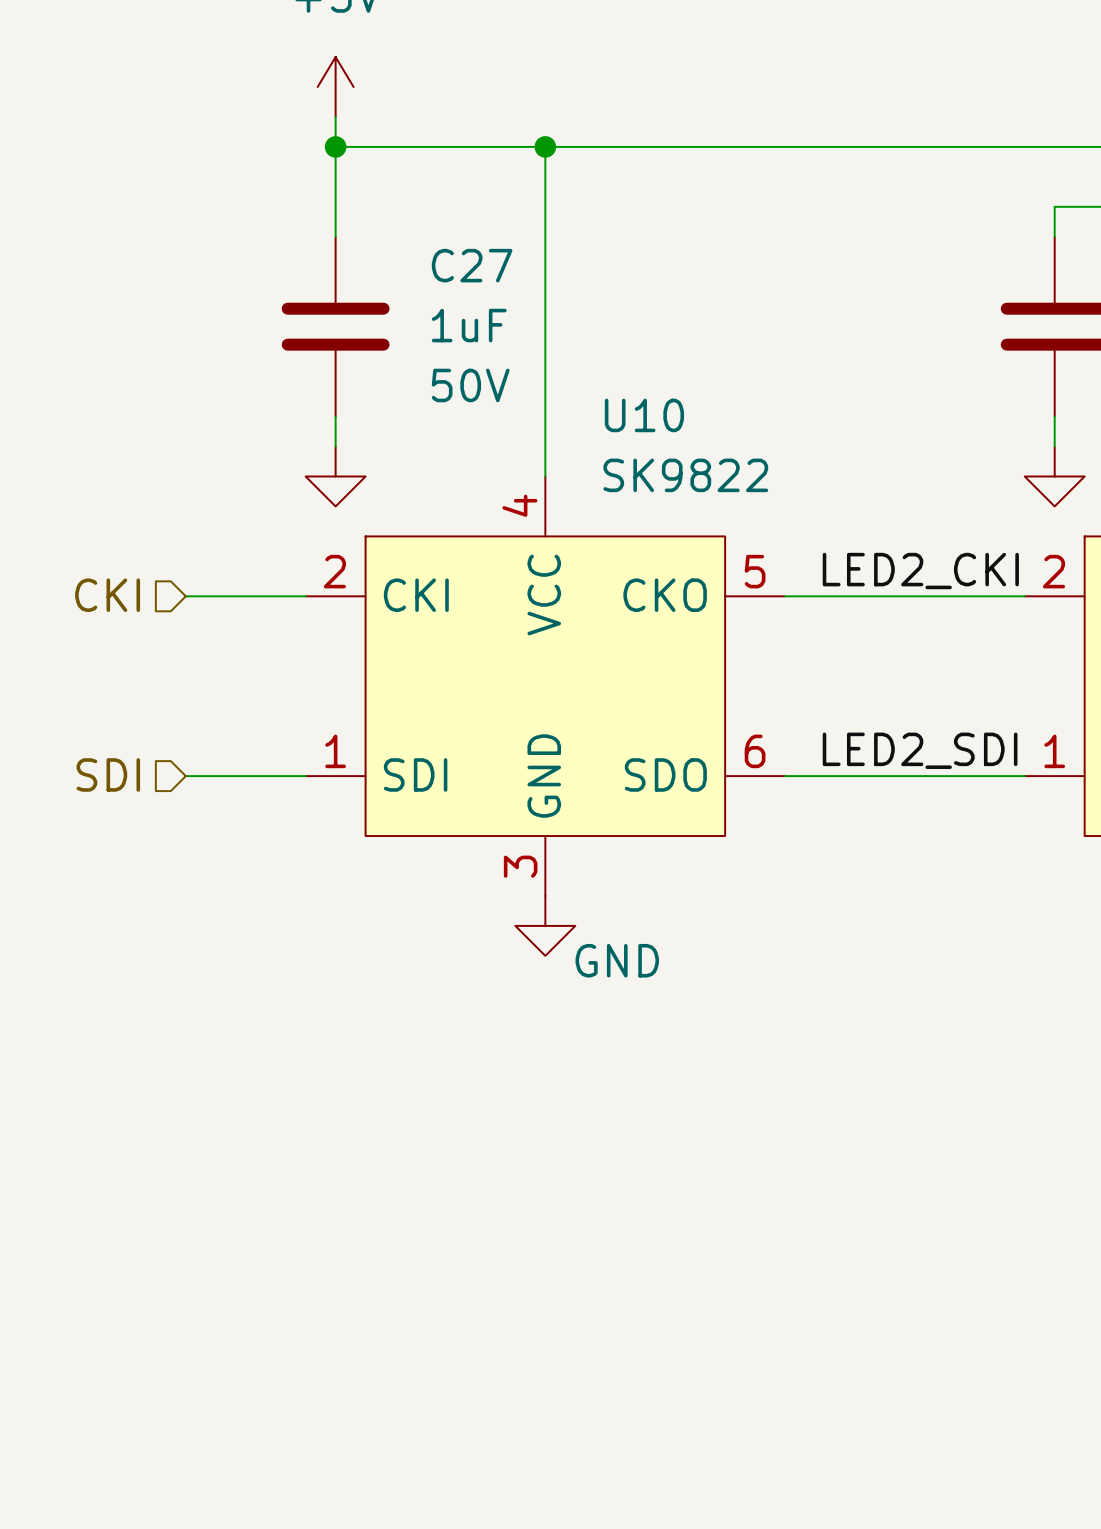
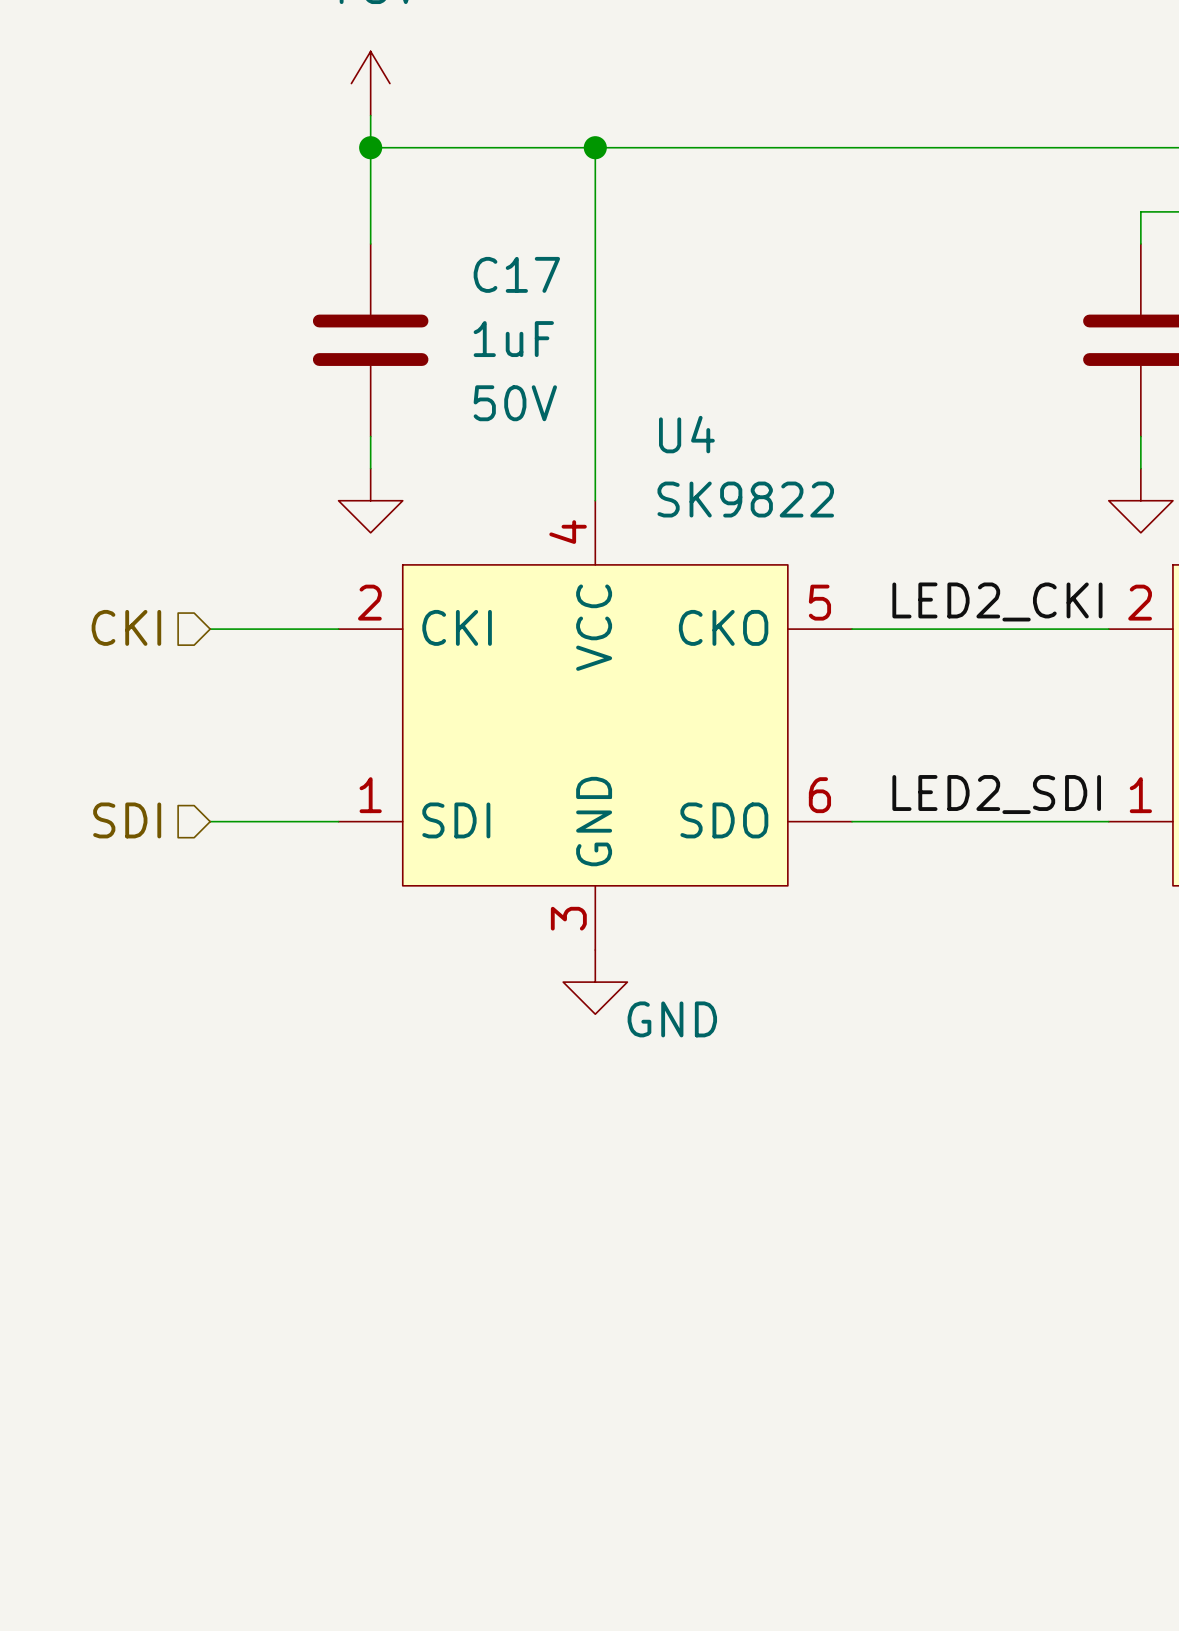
C27 name: C27 (472, 265) -> C17 (516, 274)
U10 name: U10 (644, 415) -> U4 (686, 434)

